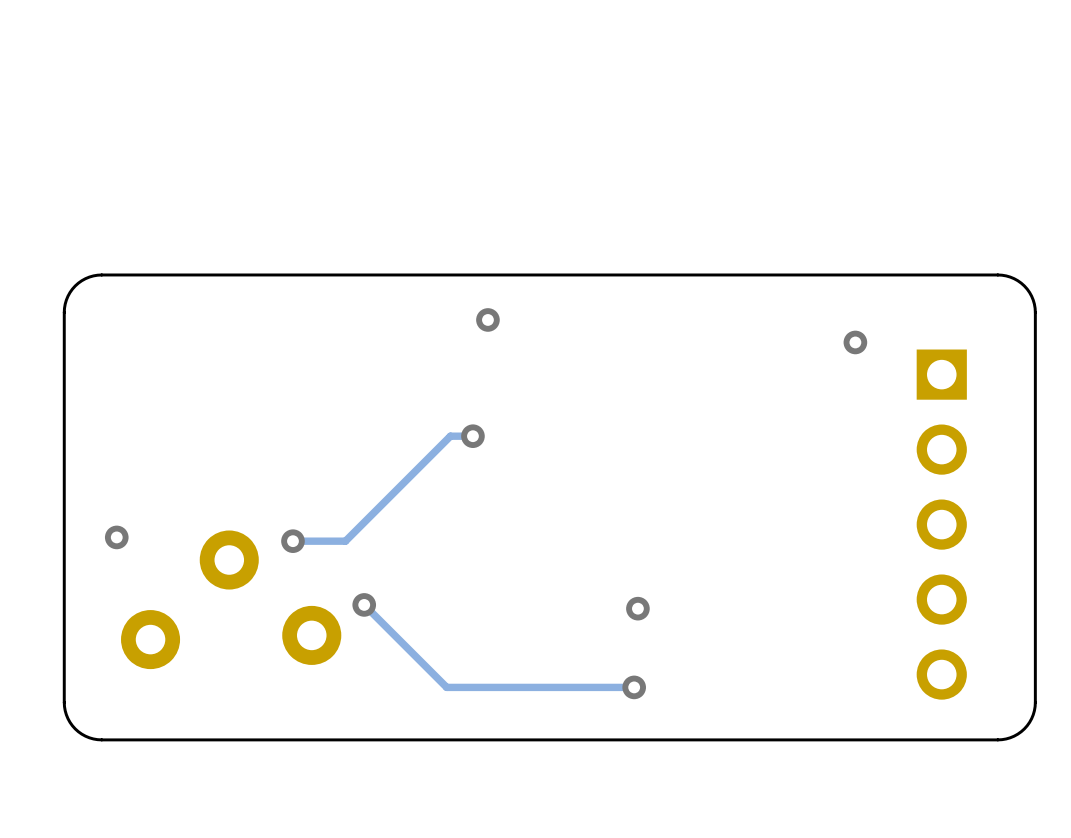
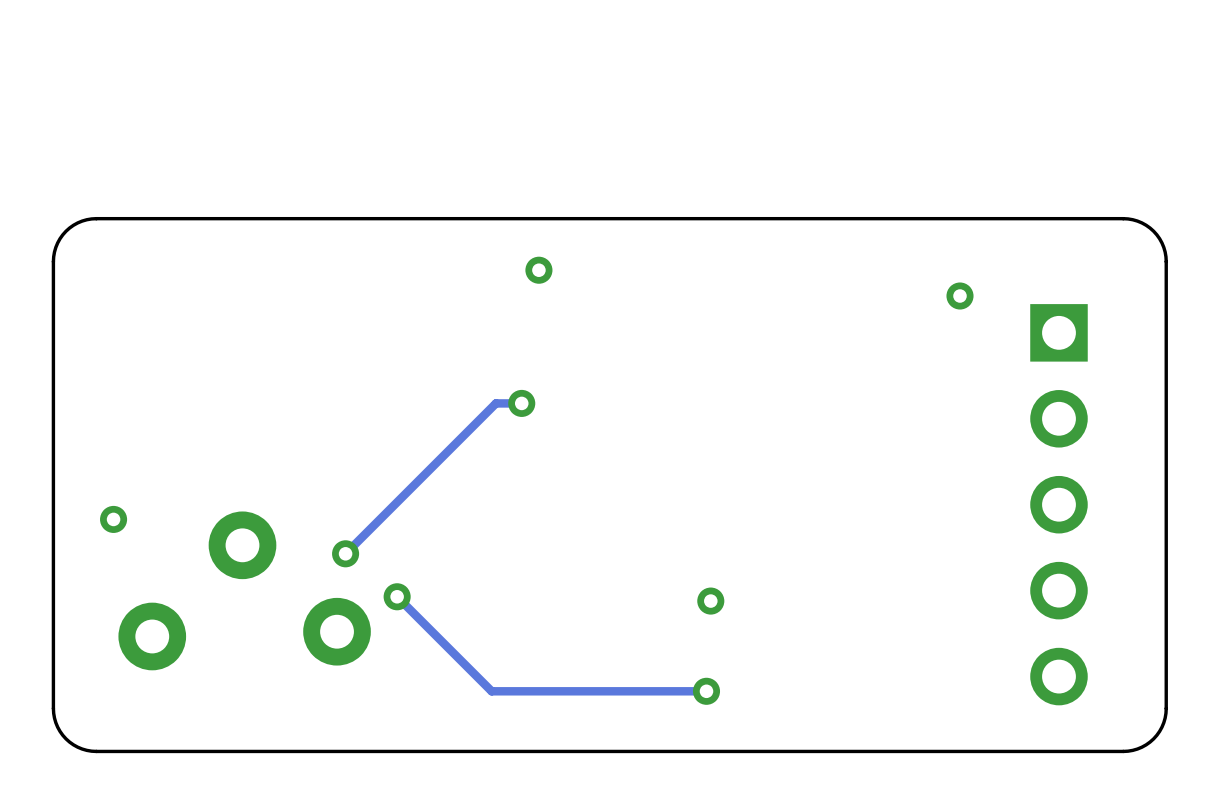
via position: (292, 541) -> (345, 553)
track: (345, 541) (292, 541) -> (375, 523) (345, 553)

